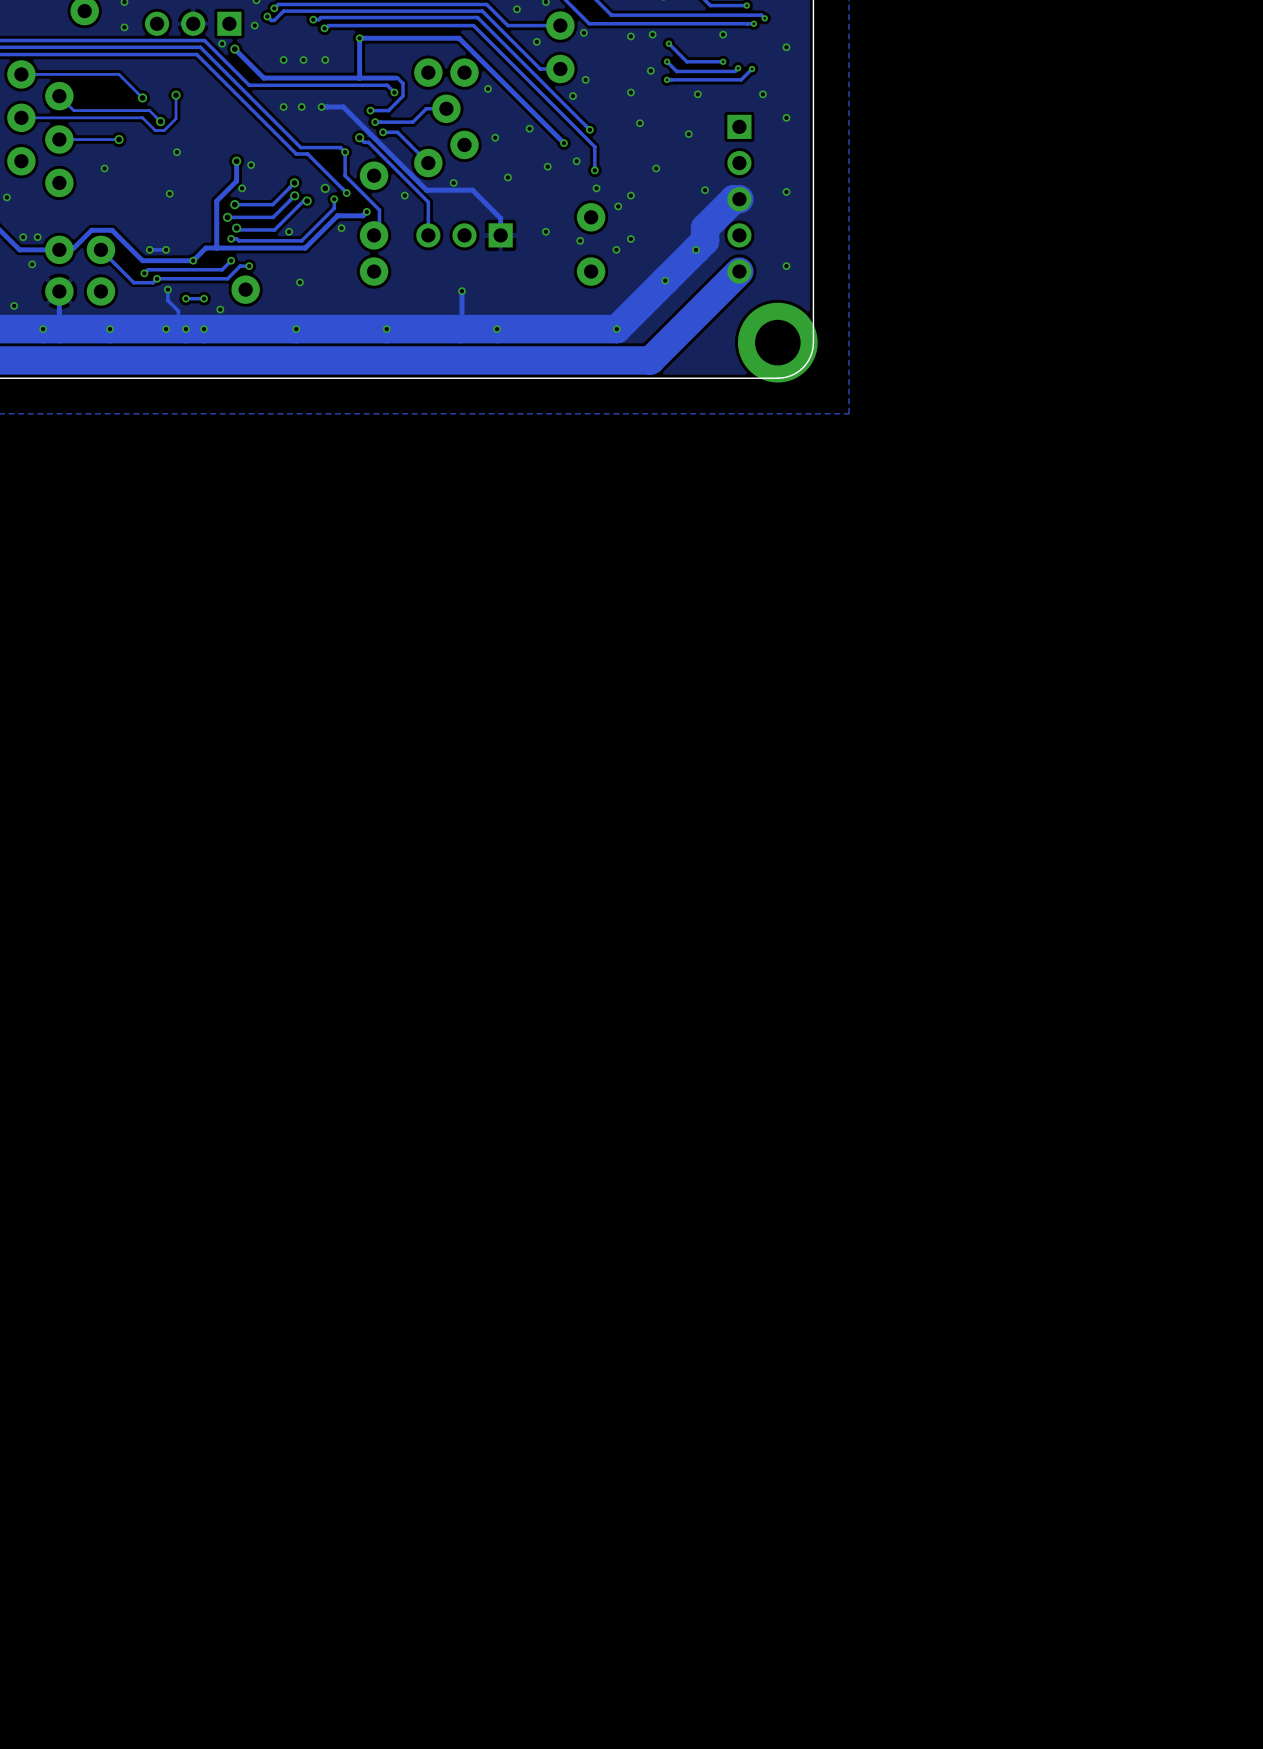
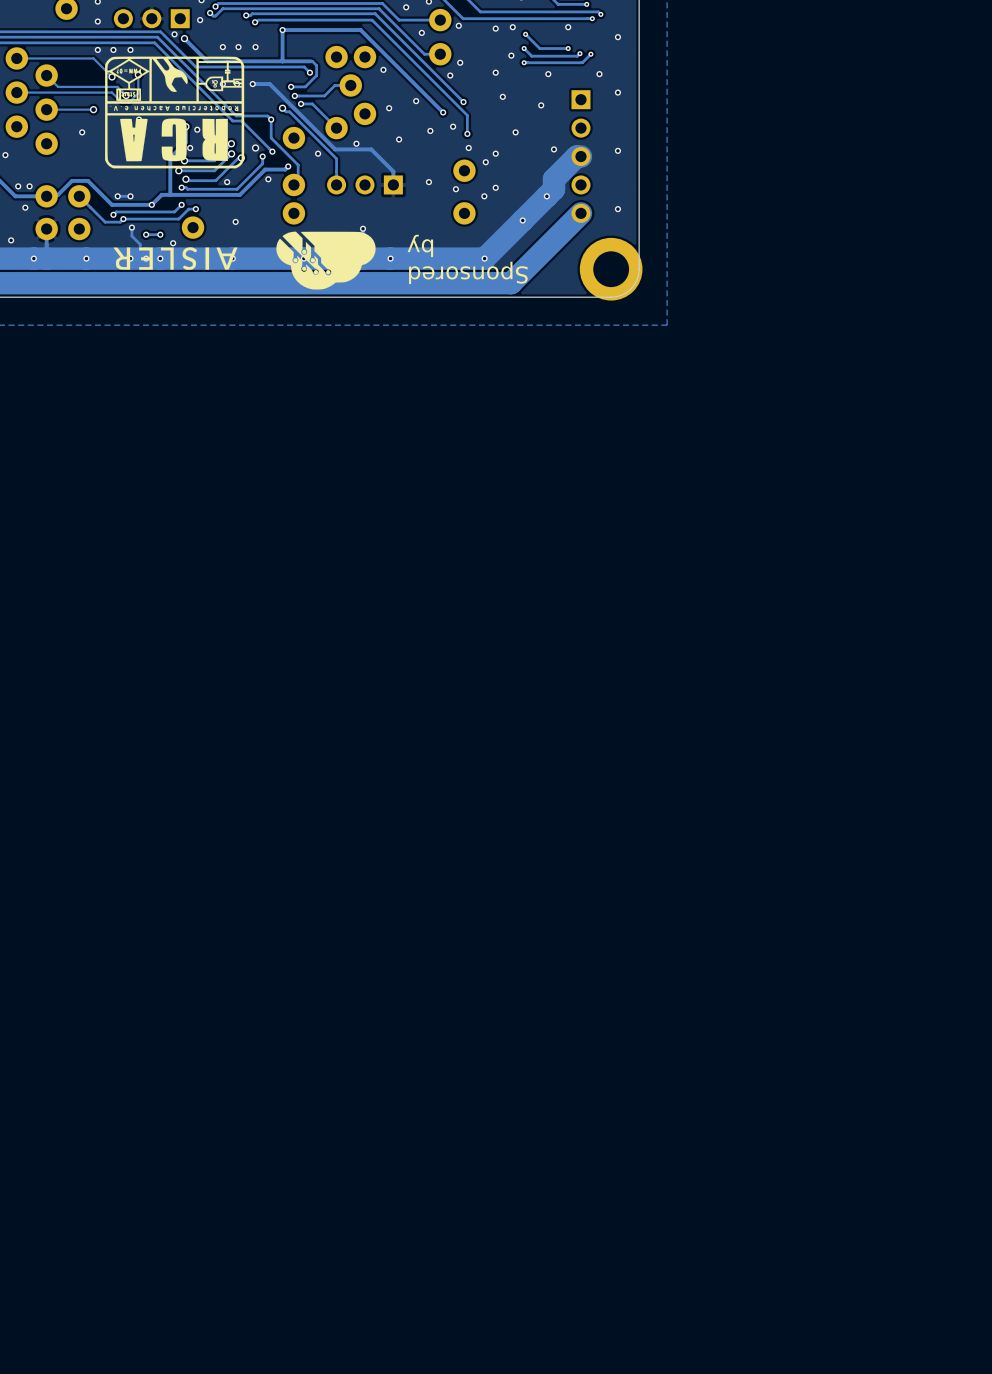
via: none -> (97, 49)
via: none -> (113, 49)
via: none -> (130, 49)
drawing: none -> [105, 56, 245, 169]
drawing: none -> [113, 231, 376, 290]
text: none -> by (420, 245)
text: none -> Sponsored (468, 272)

